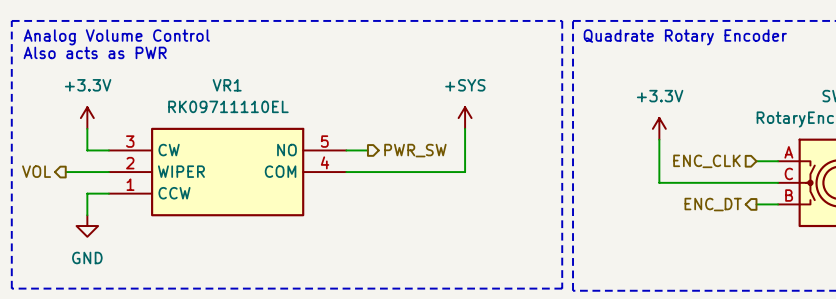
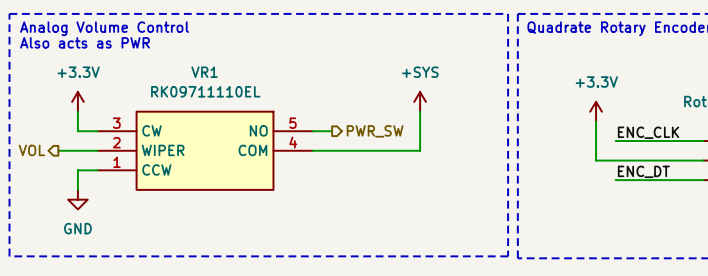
label: none -> ENC_CLK (648, 132)
wire: none -> (615, 141) (684, 141)
hierarchical label: ENC_CLK (706, 161) -> none
label: none -> ENC_DT (643, 171)
wire: none -> (615, 180) (684, 180)
hierarchical label: ENC_DT (713, 204) -> none

